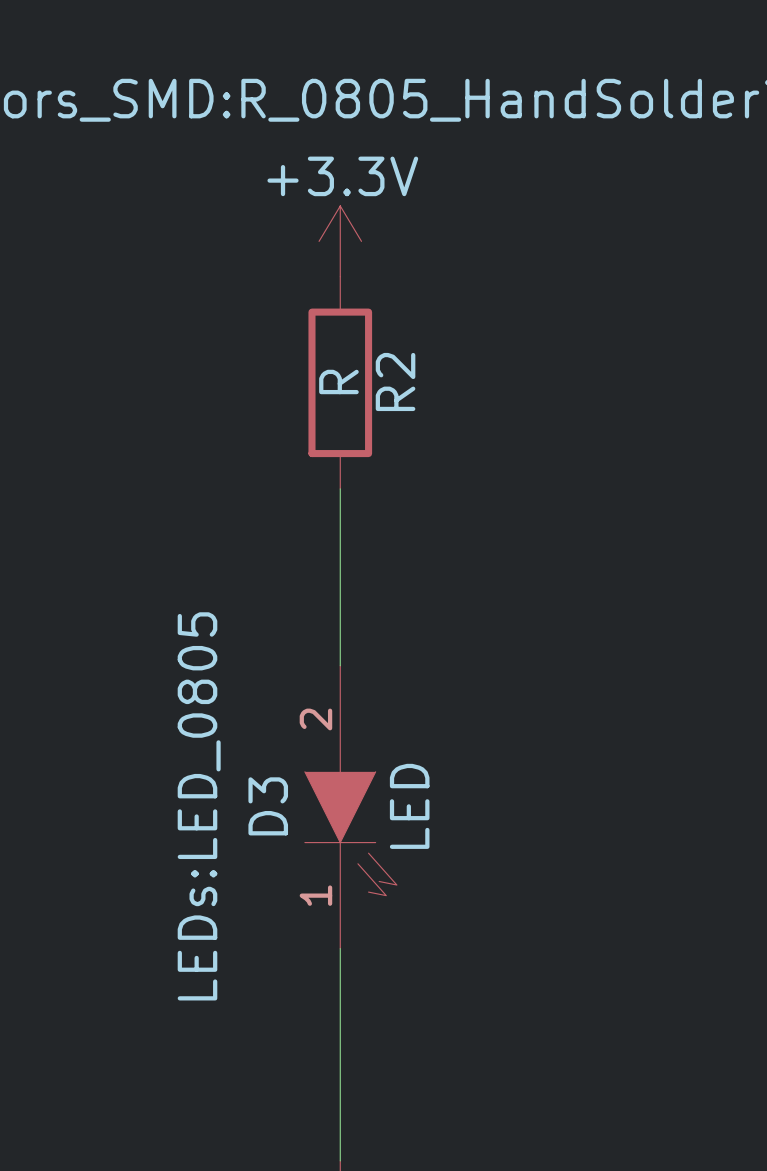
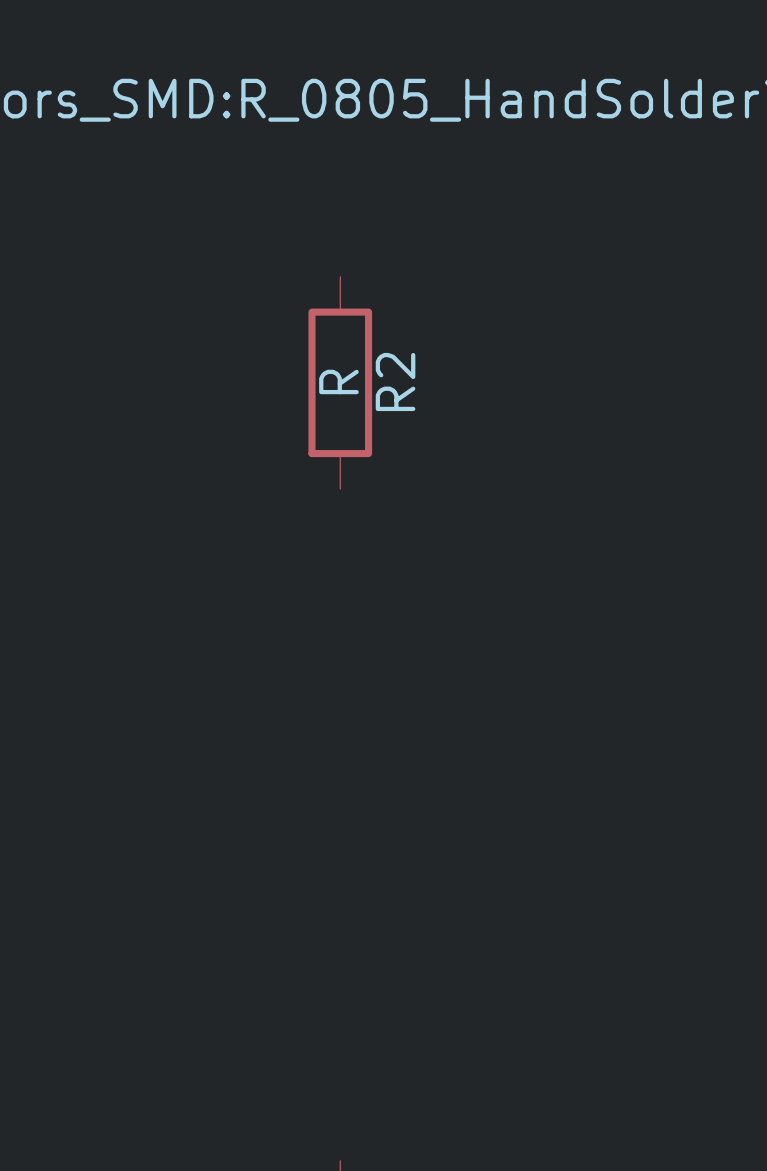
power symbol: +3.3V (340, 241) -> none
wire: (340, 488) (340, 665) -> none
D3: LED (350, 807) -> none
wire: (340, 948) (340, 1160) -> none

